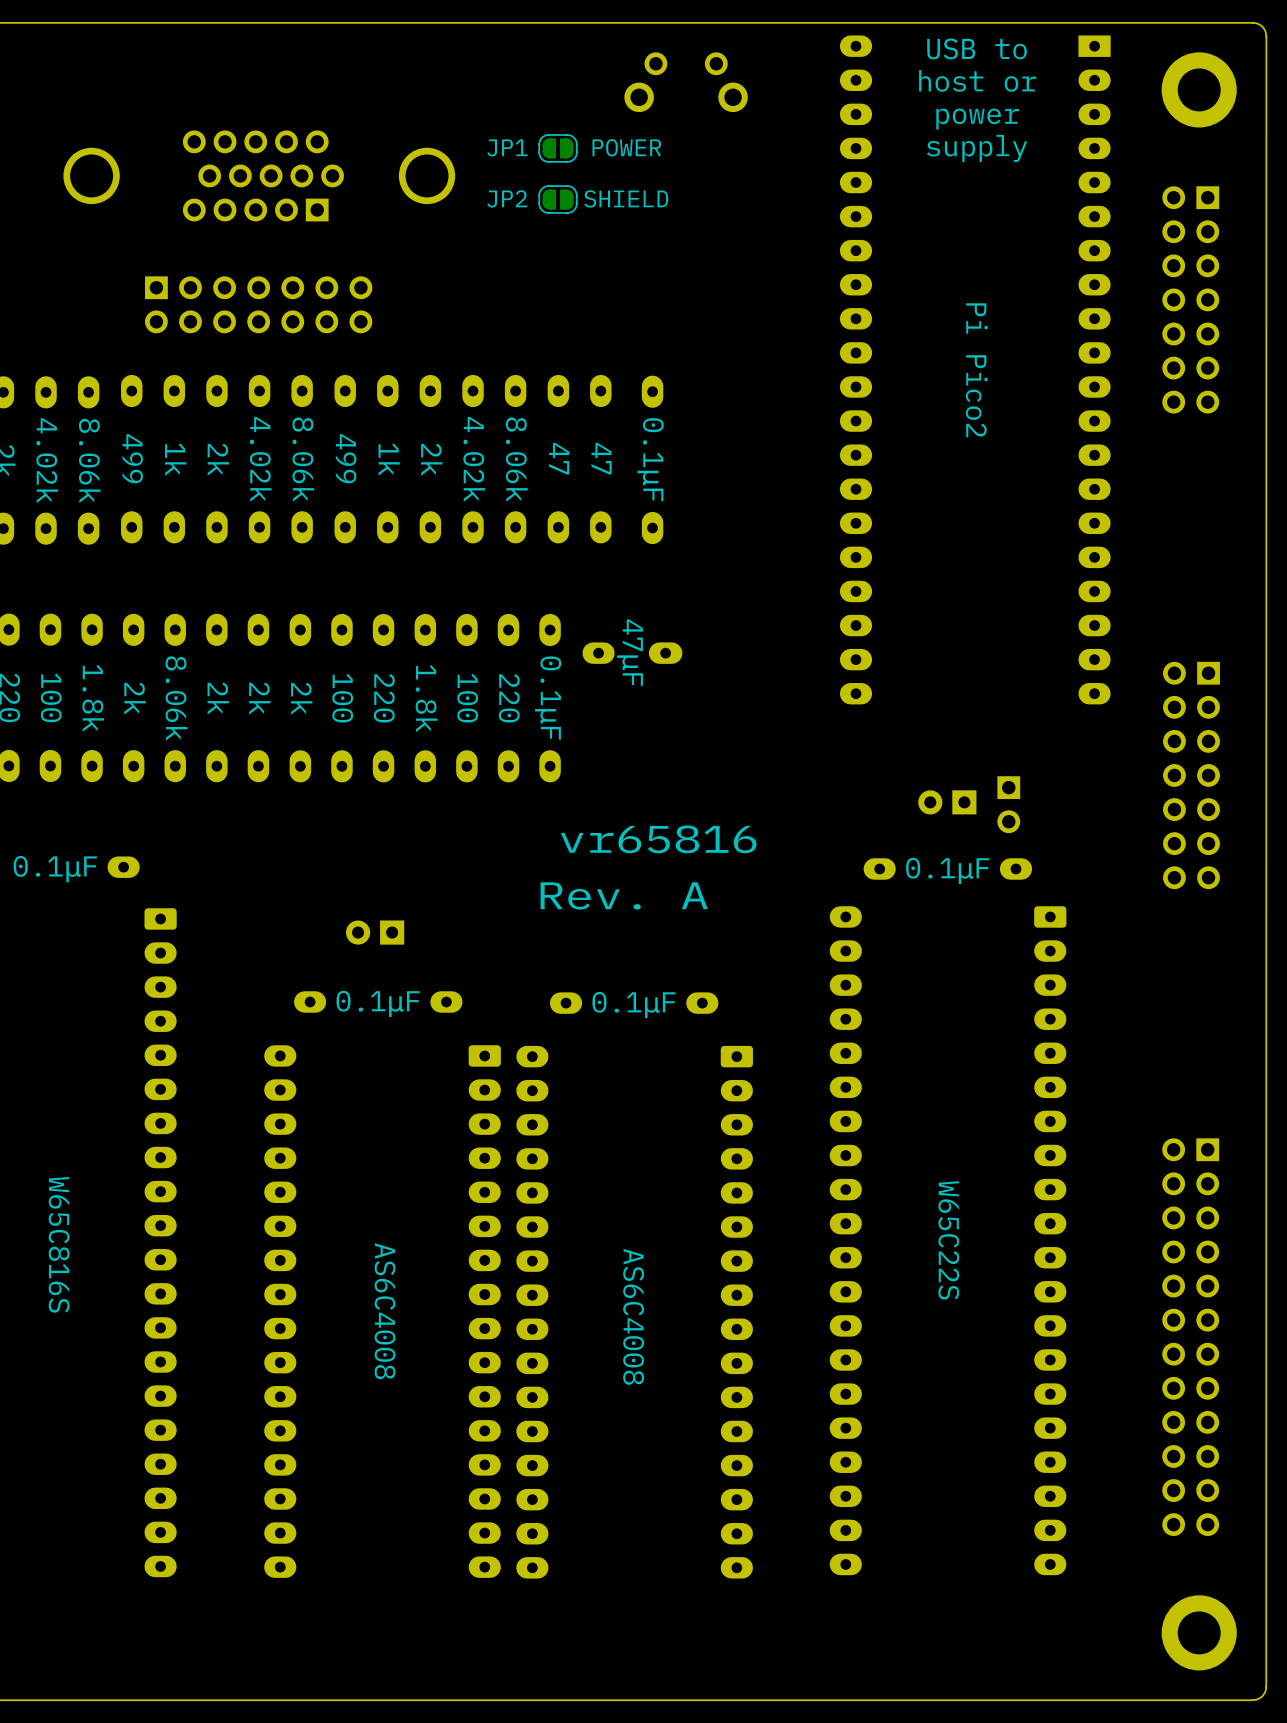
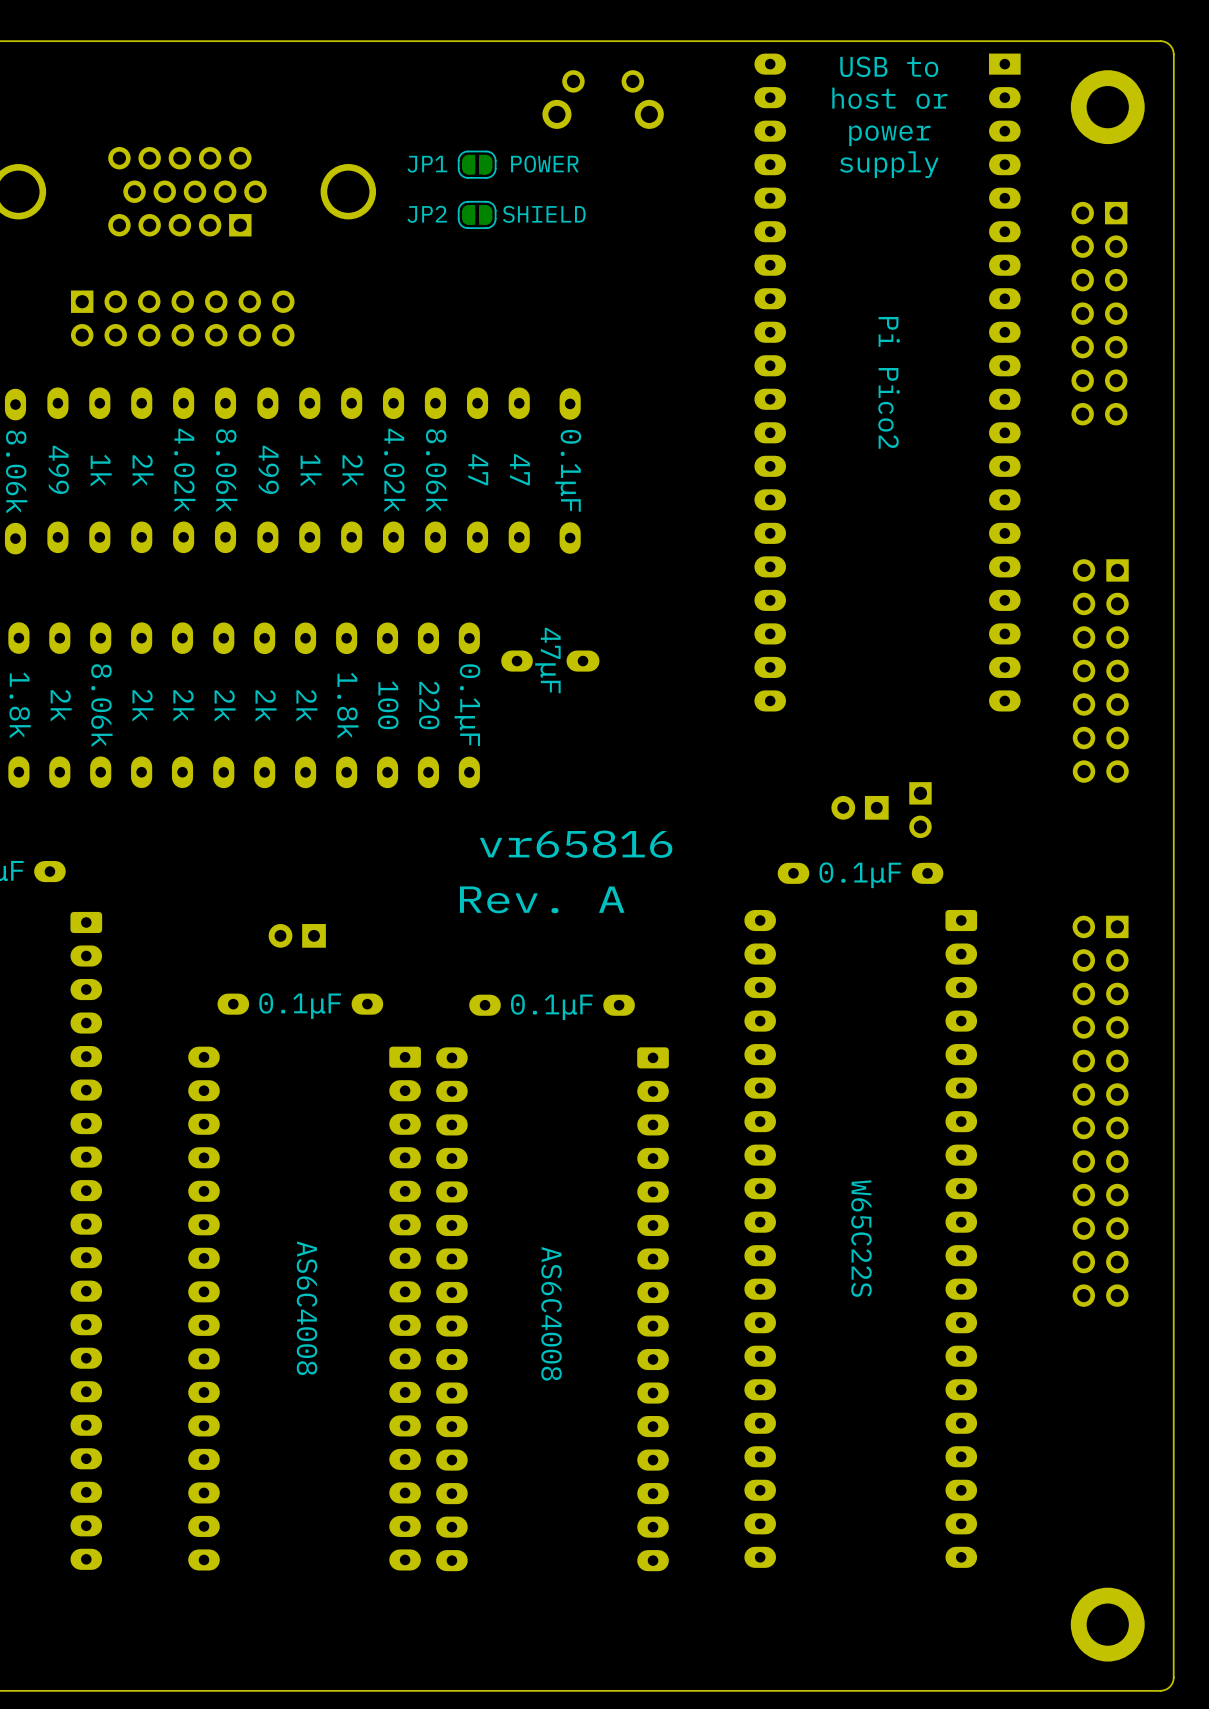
part value: 100 (342, 698) -> 2k (266, 705)
part value: 220 (384, 698) -> 2k (306, 705)
part position: (1191, 775) -> (1100, 670)
part position: (1190, 1337) -> (1100, 1111)

